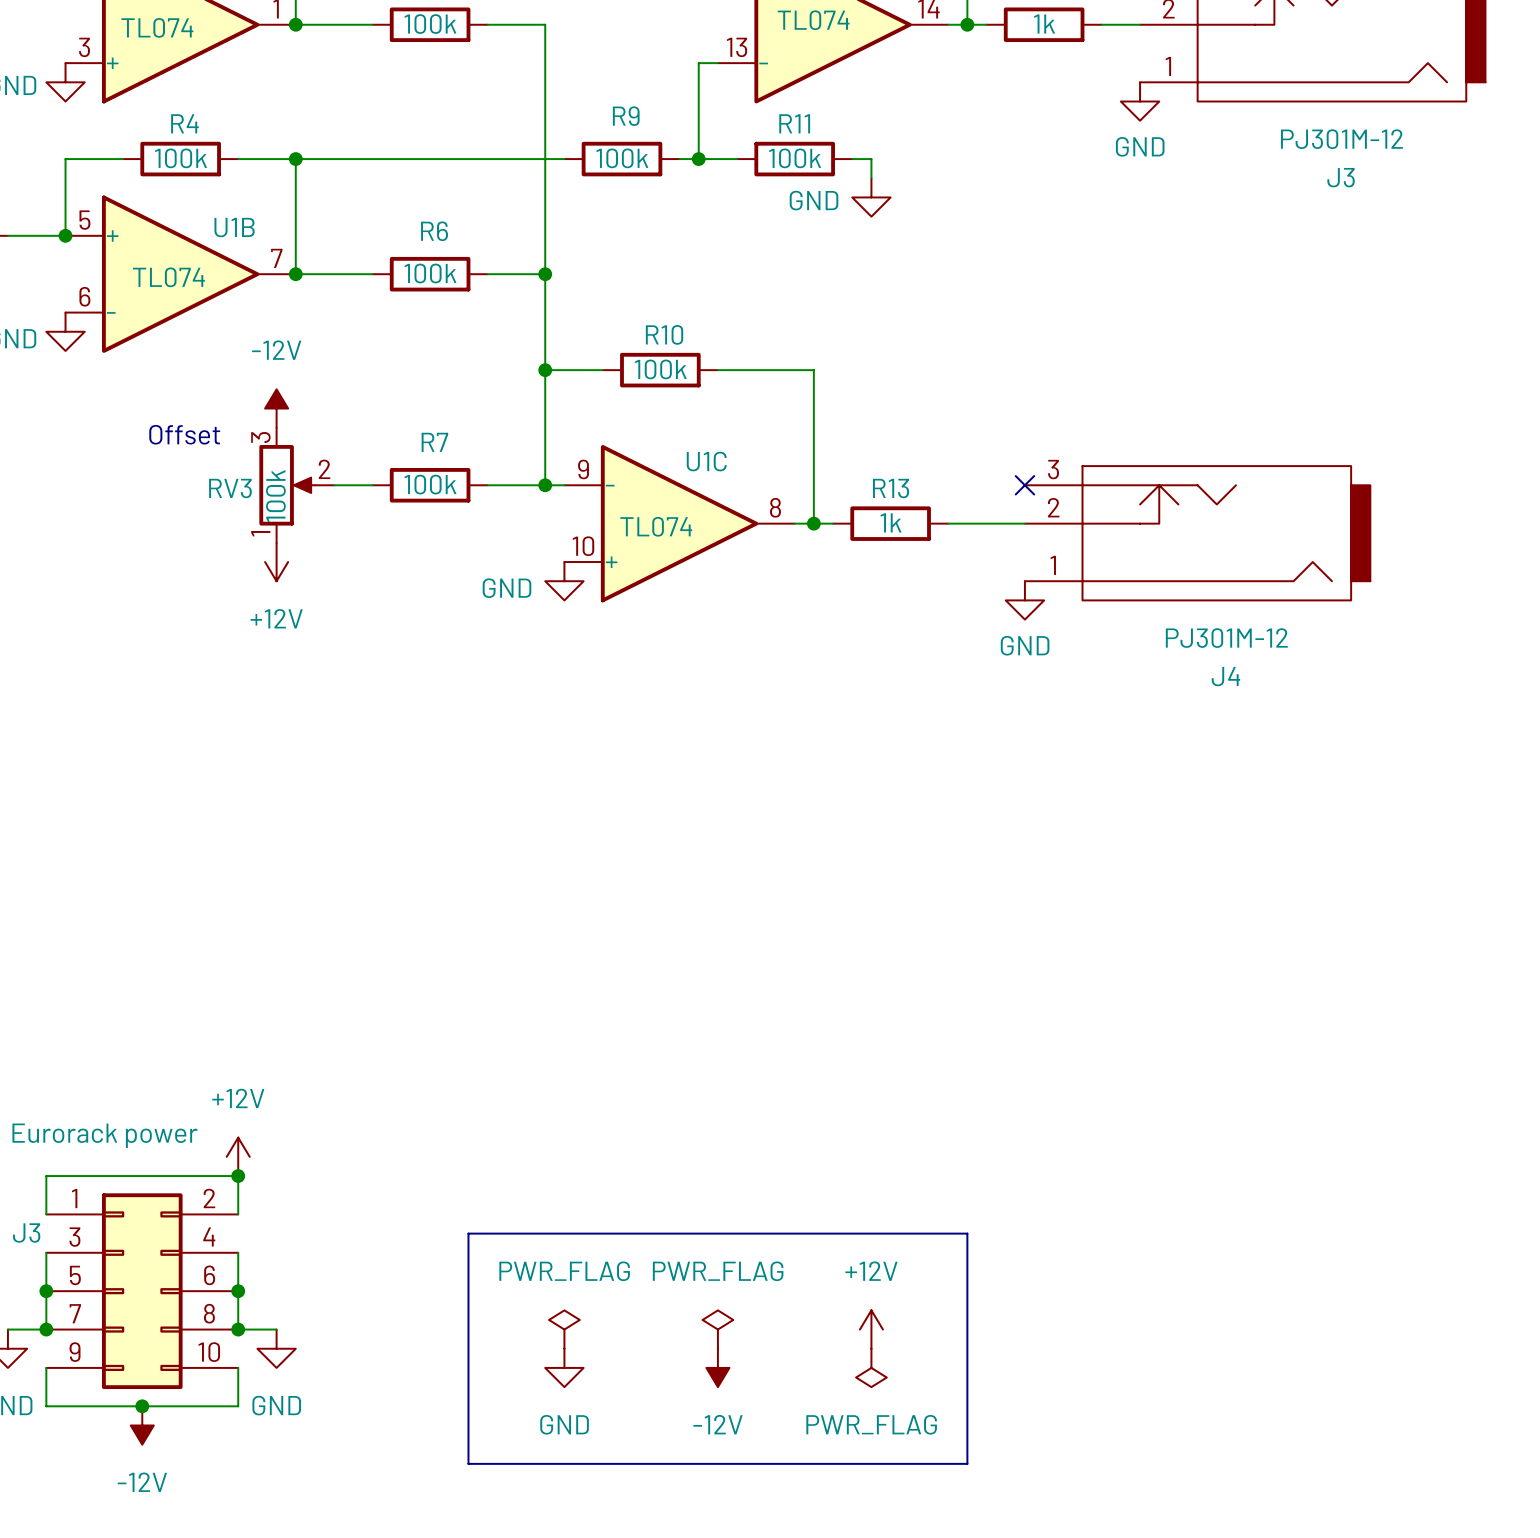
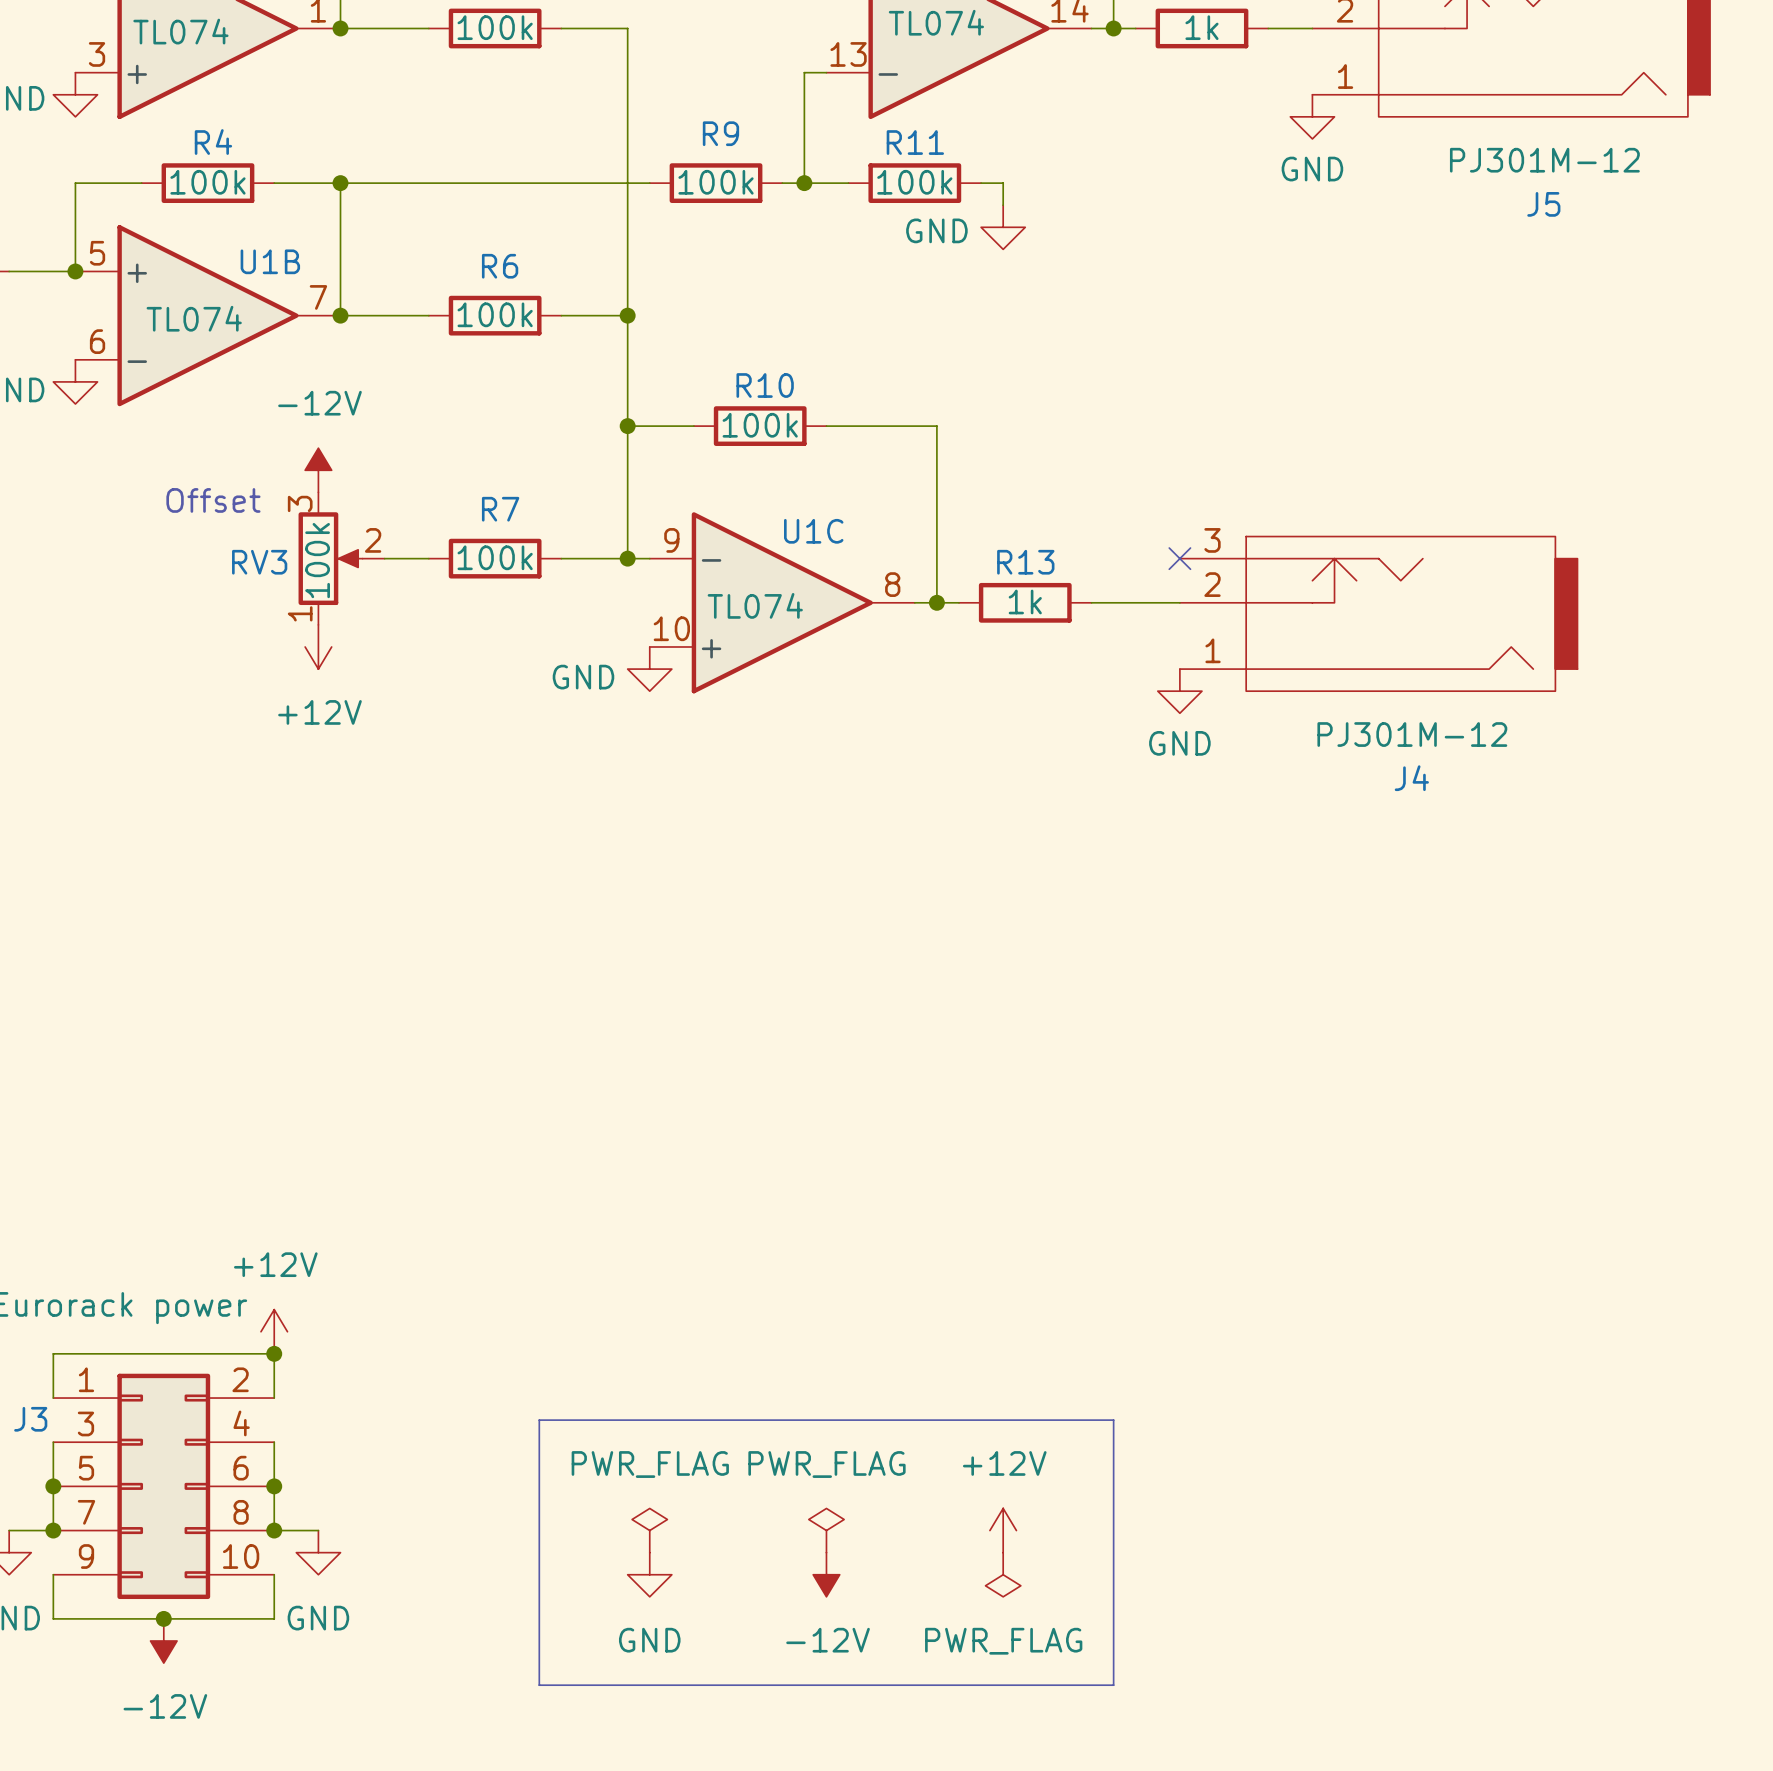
J3 name: J3 (1341, 177) -> J5 (1543, 204)

